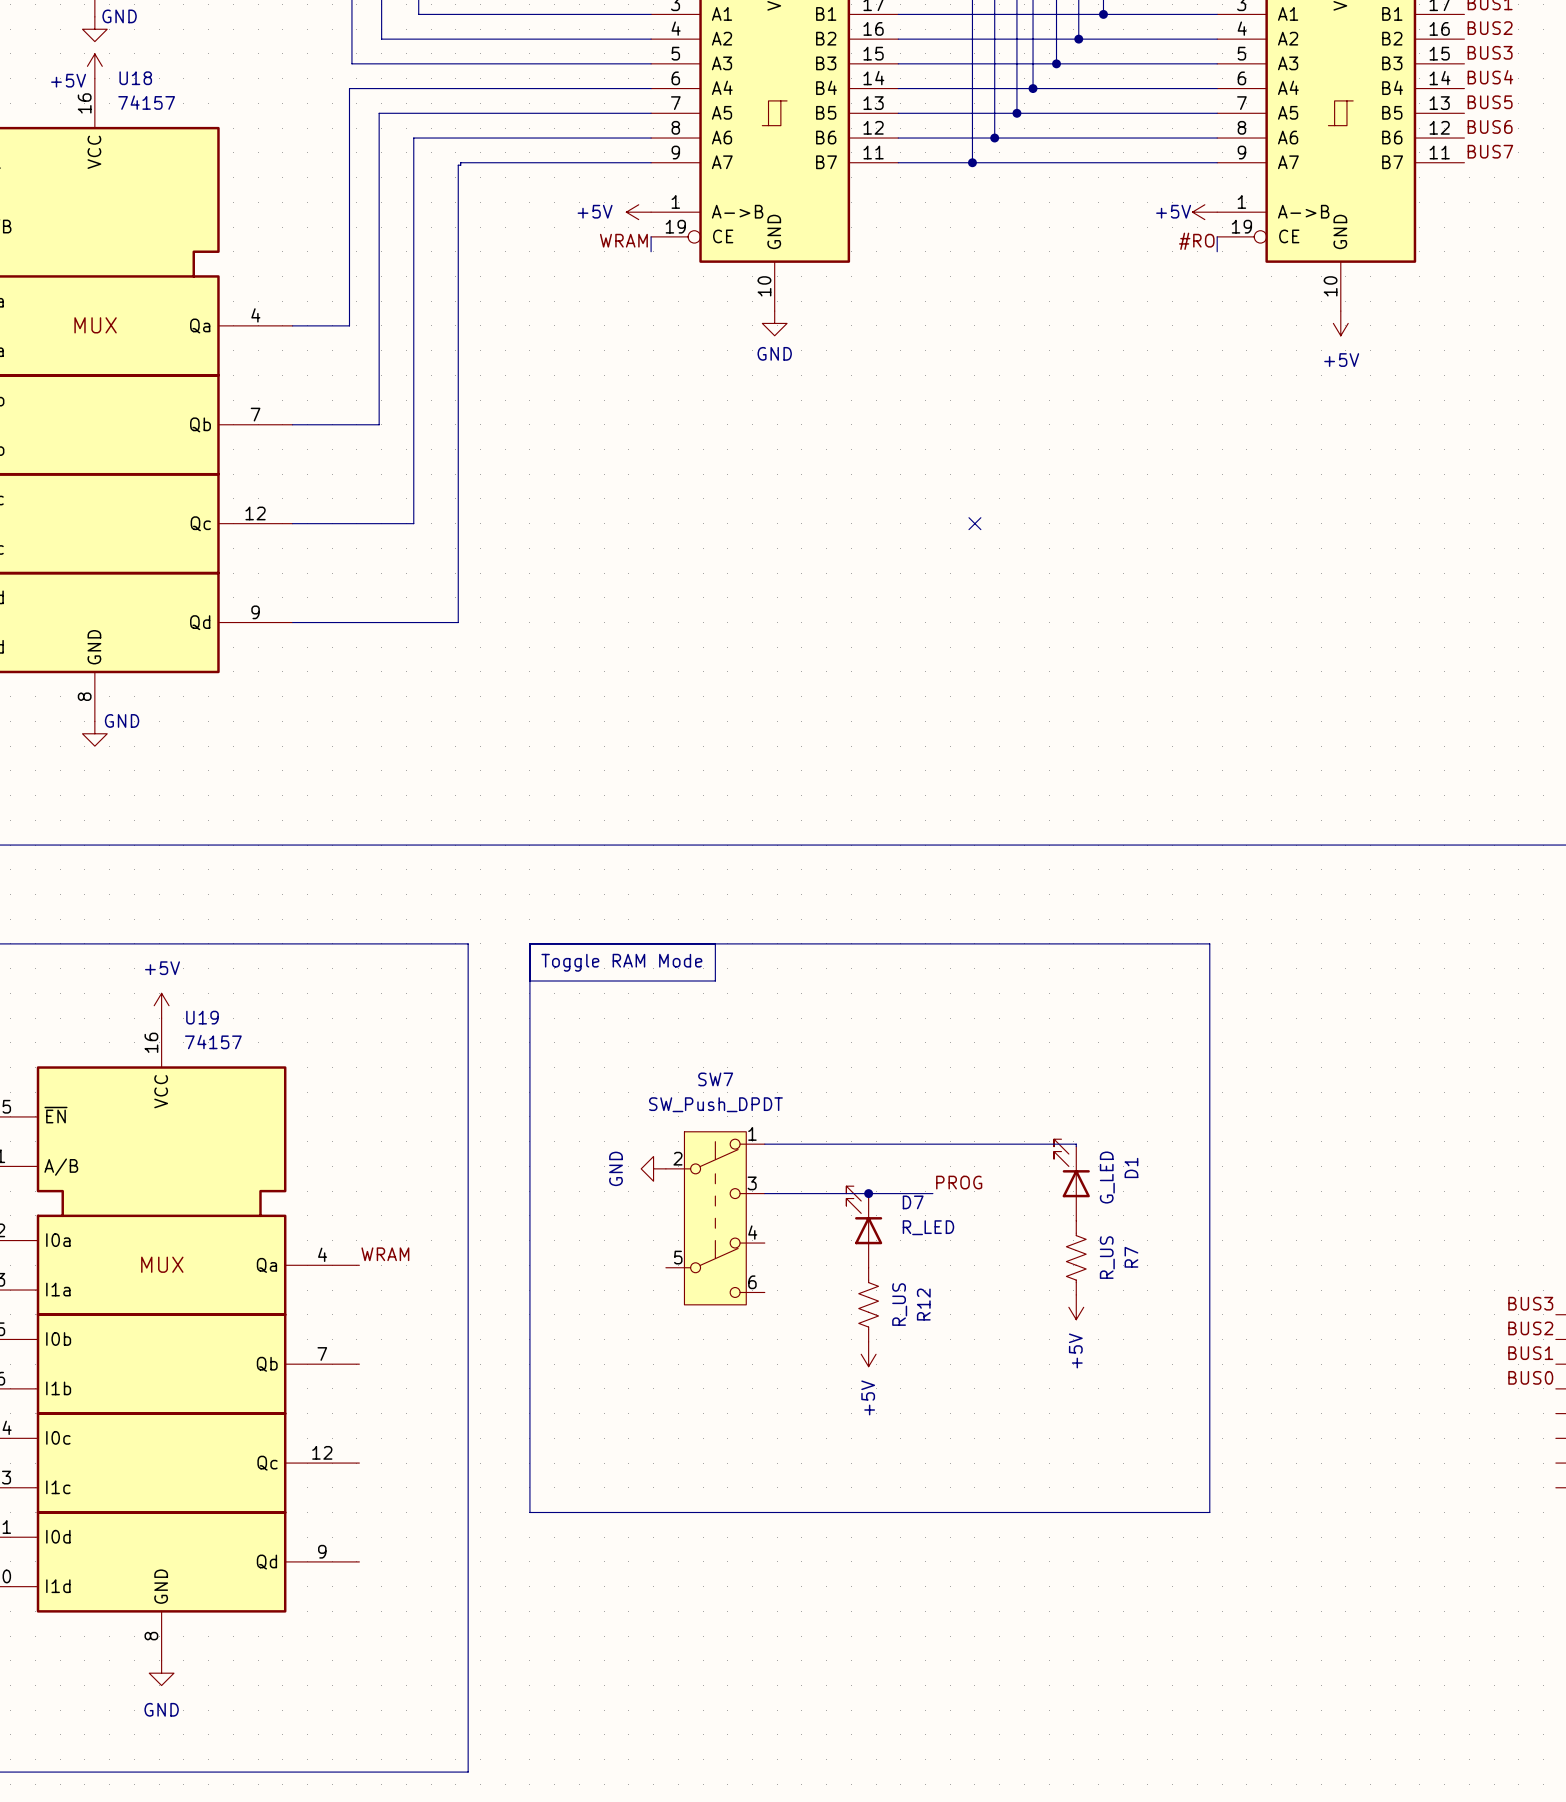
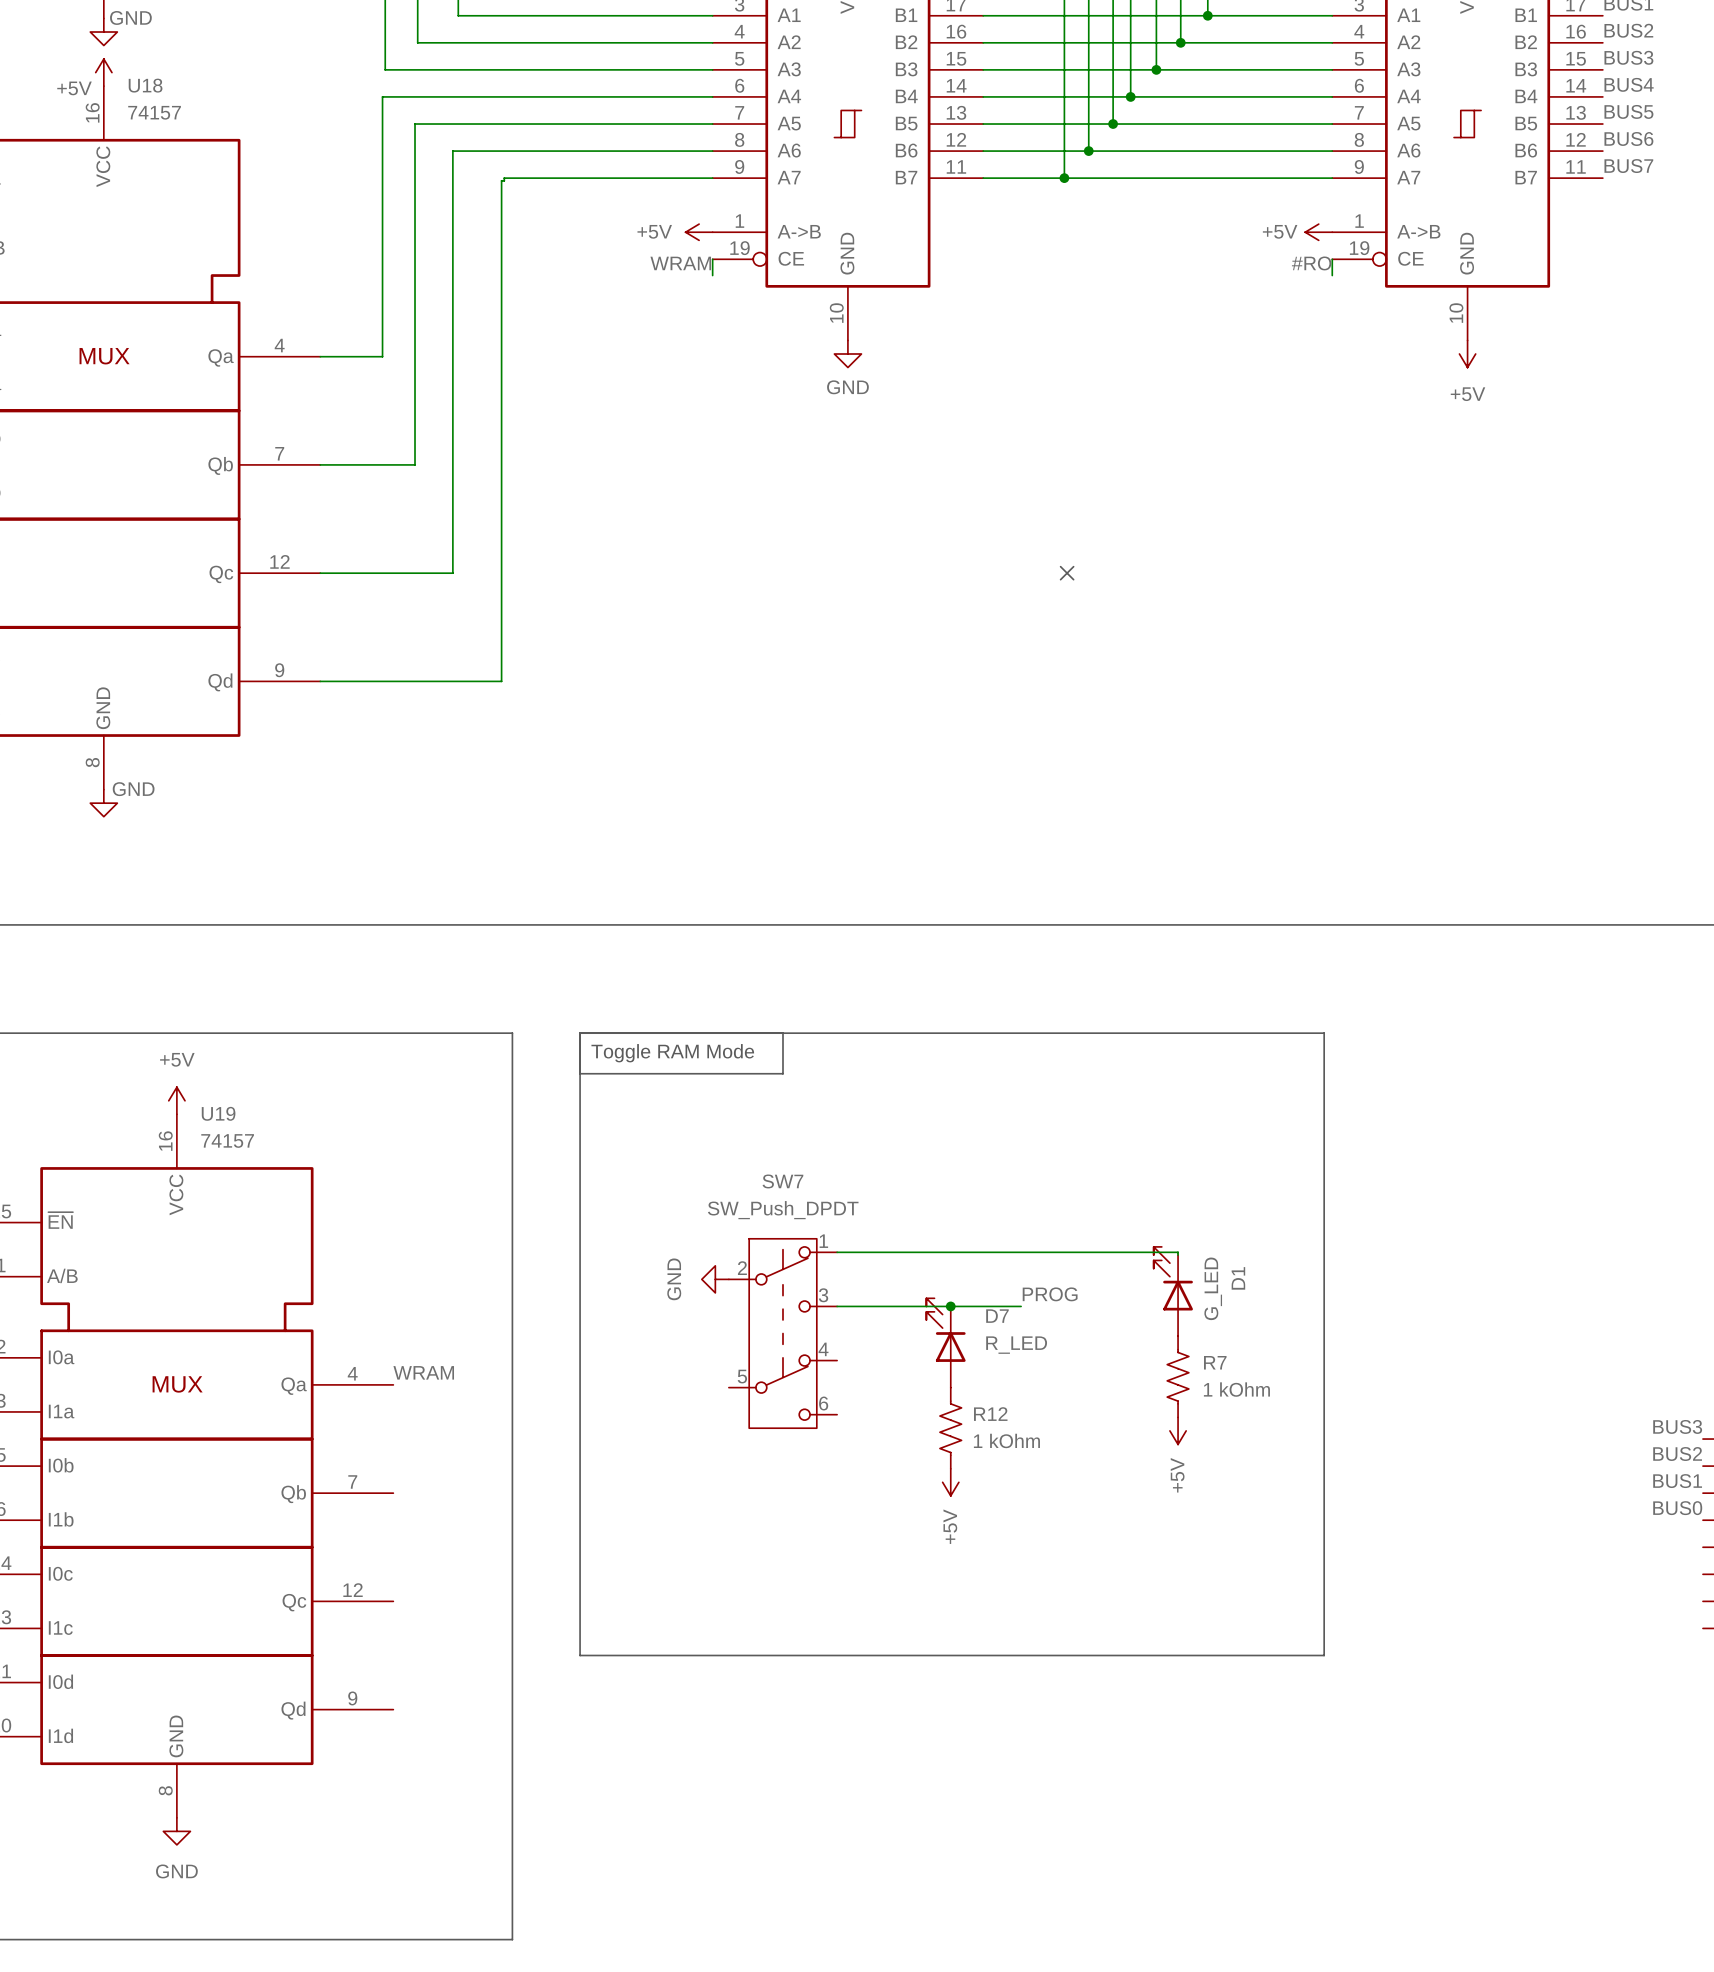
R7 value: R_US (1107, 1257) -> 1 kOhm (1236, 1389)
R7 name rotation: 0° (1131, 1257) -> 90° clockwise (1215, 1362)
R12 value: R_US (899, 1304) -> 1 kOhm (1006, 1440)
R12 name rotation: 0° (923, 1304) -> 90° clockwise (990, 1414)

